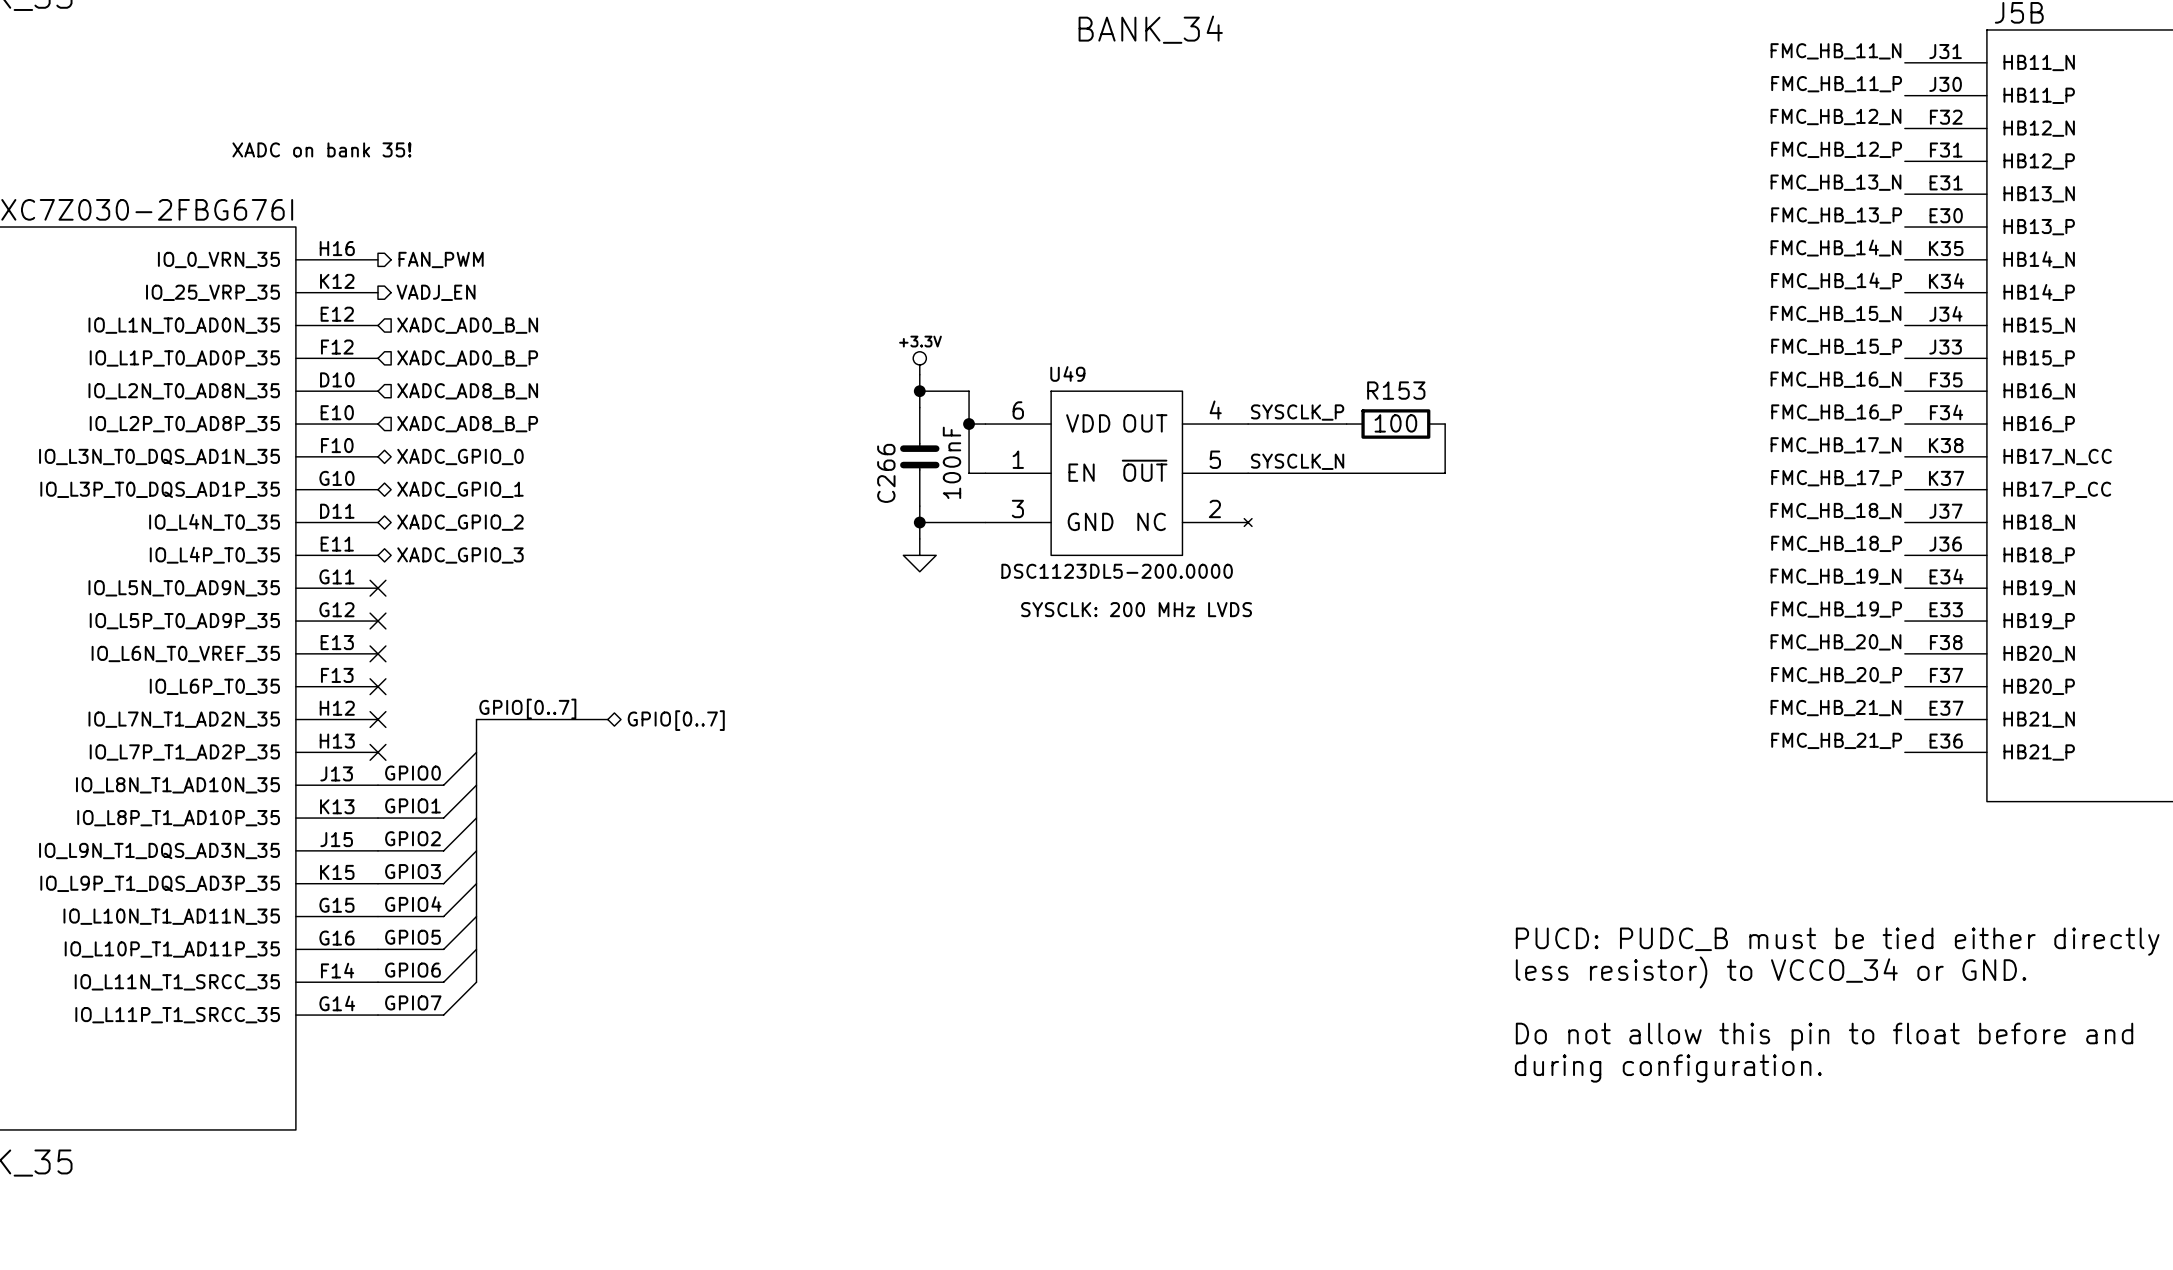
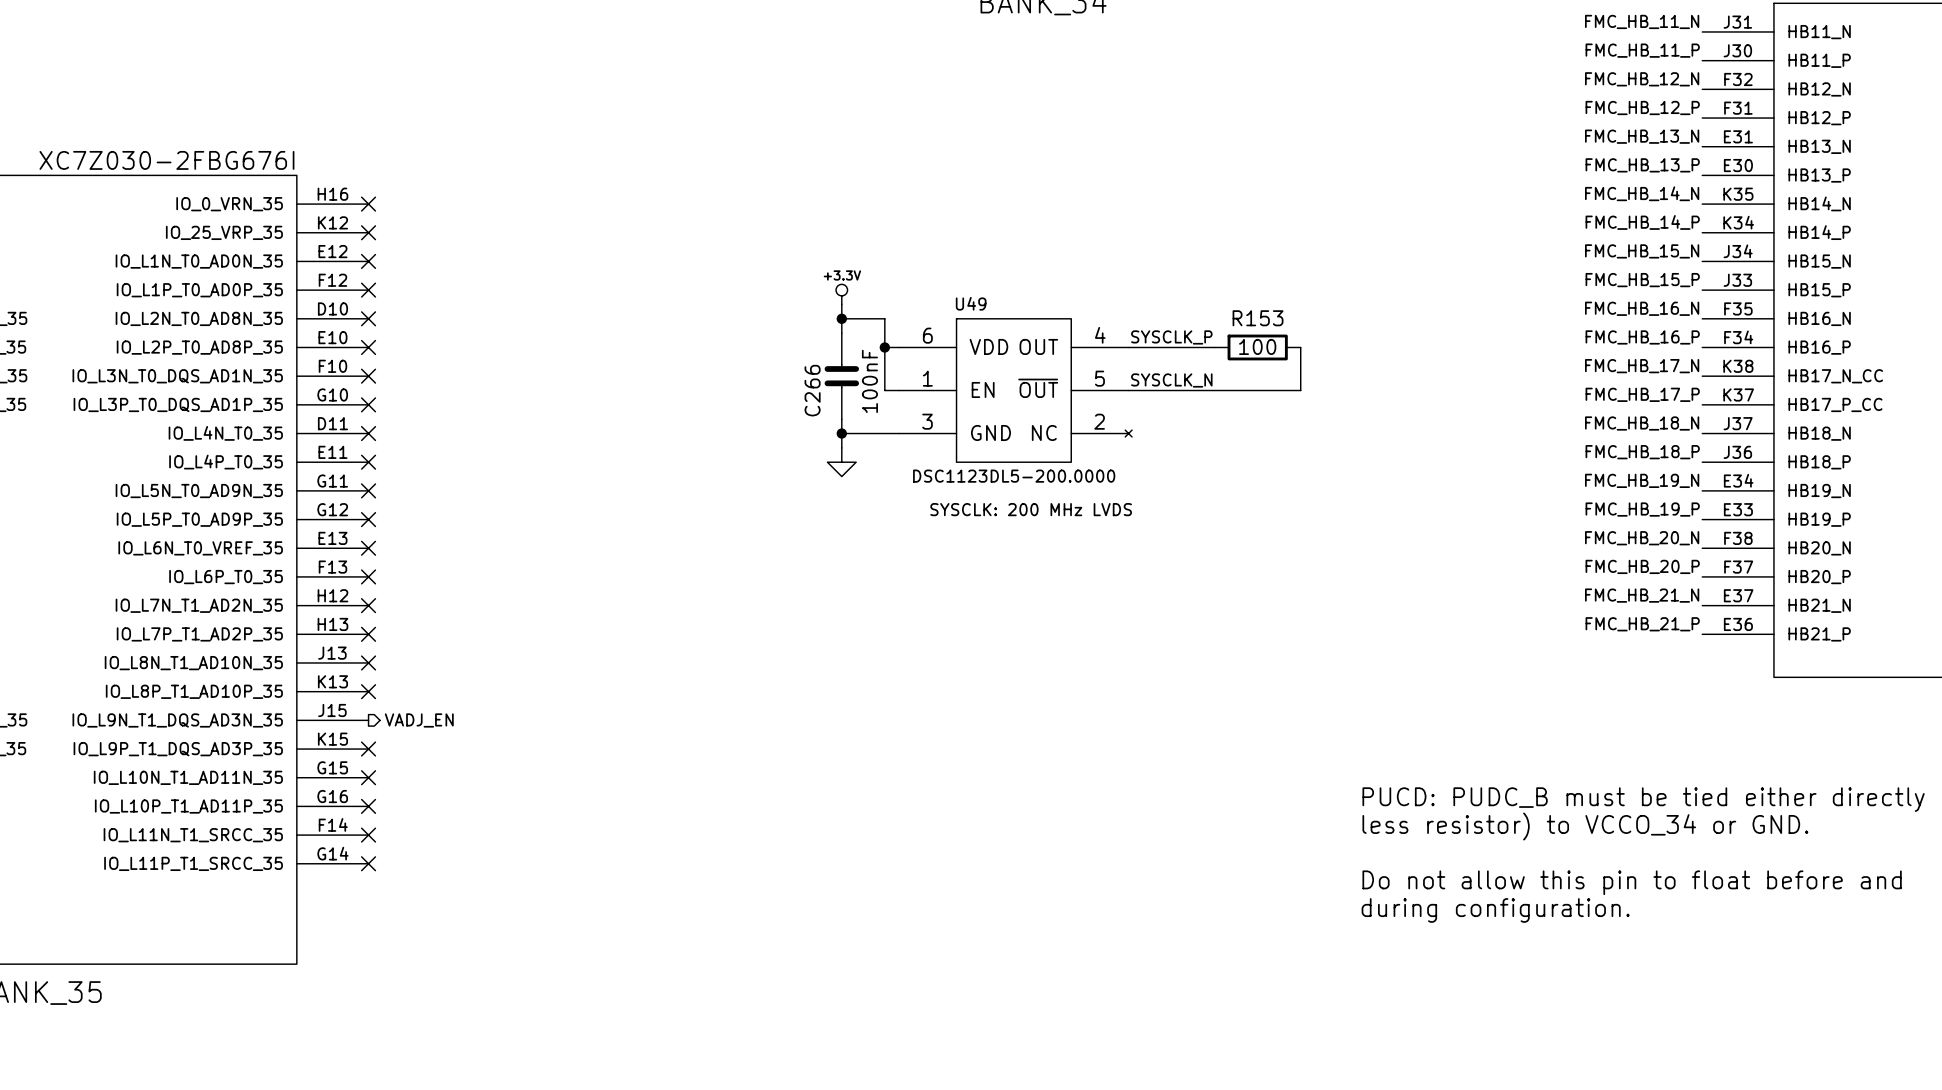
text: XADC on bank 35! (321, 149) -> none
no-connect mark: none -> (368, 204)
hierarchical label: FAN_PWM (441, 259) -> none
no-connect mark: none -> (368, 232)
hierarchical label: VADJ_EN (436, 292) -> none
no-connect mark: none -> (368, 261)
hierarchical label: XADC_AD0_B_N (467, 325) -> none
no-connect mark: none -> (368, 290)
hierarchical label: XADC_AD0_B_P (467, 358) -> none
no-connect mark: none -> (368, 318)
hierarchical label: XADC_AD8_B_N (467, 391) -> none
no-connect mark: none -> (368, 347)
hierarchical label: XADC_AD8_B_P (467, 424) -> none
no-connect mark: none -> (368, 376)
hierarchical label: XADC_GPIO_0 (460, 456) -> none
no-connect mark: none -> (368, 404)
hierarchical label: XADC_GPIO_1 (460, 489) -> none
no-connect mark: none -> (368, 433)
hierarchical label: XADC_GPIO_2 (460, 522) -> none
no-connect mark: none -> (368, 462)
hierarchical label: XADC_GPIO_3 (460, 555) -> none
label: GPIO[0..7] (527, 708) -> none
bus: (607, 719) (476, 719) (476, 982) -> none
hierarchical label: GPIO[0..7] (676, 720) -> none
wire: (476, 752) (443, 785) (378, 785) -> none
label: GPIO0 (412, 773) -> none
no-connect mark: none -> (368, 662)
wire: (476, 785) (443, 818) (378, 818) -> none
label: GPIO1 (412, 805) -> none
no-connect mark: none -> (368, 691)
wire: (476, 818) (443, 850) (378, 850) -> none
label: GPIO2 (412, 838) -> none
wire: (476, 850) (443, 883) (378, 883) -> none
hierarchical label: none -> VADJ_EN (419, 720)
label: GPIO3 (412, 871) -> none
no-connect mark: none -> (368, 749)
wire: (476, 883) (443, 916) (378, 916) -> none
label: GPIO4 (413, 904) -> none
no-connect mark: none -> (368, 777)
wire: (476, 916) (443, 949) (378, 949) -> none
label: GPIO5 (412, 937) -> none
no-connect mark: none -> (368, 806)
wire: (476, 949) (443, 982) (378, 982) -> none
label: GPIO6 (412, 970) -> none
no-connect mark: none -> (368, 835)
wire: (476, 982) (443, 1015) (378, 1015) -> none
label: GPIO7 (413, 1002) -> none
no-connect mark: none -> (368, 863)

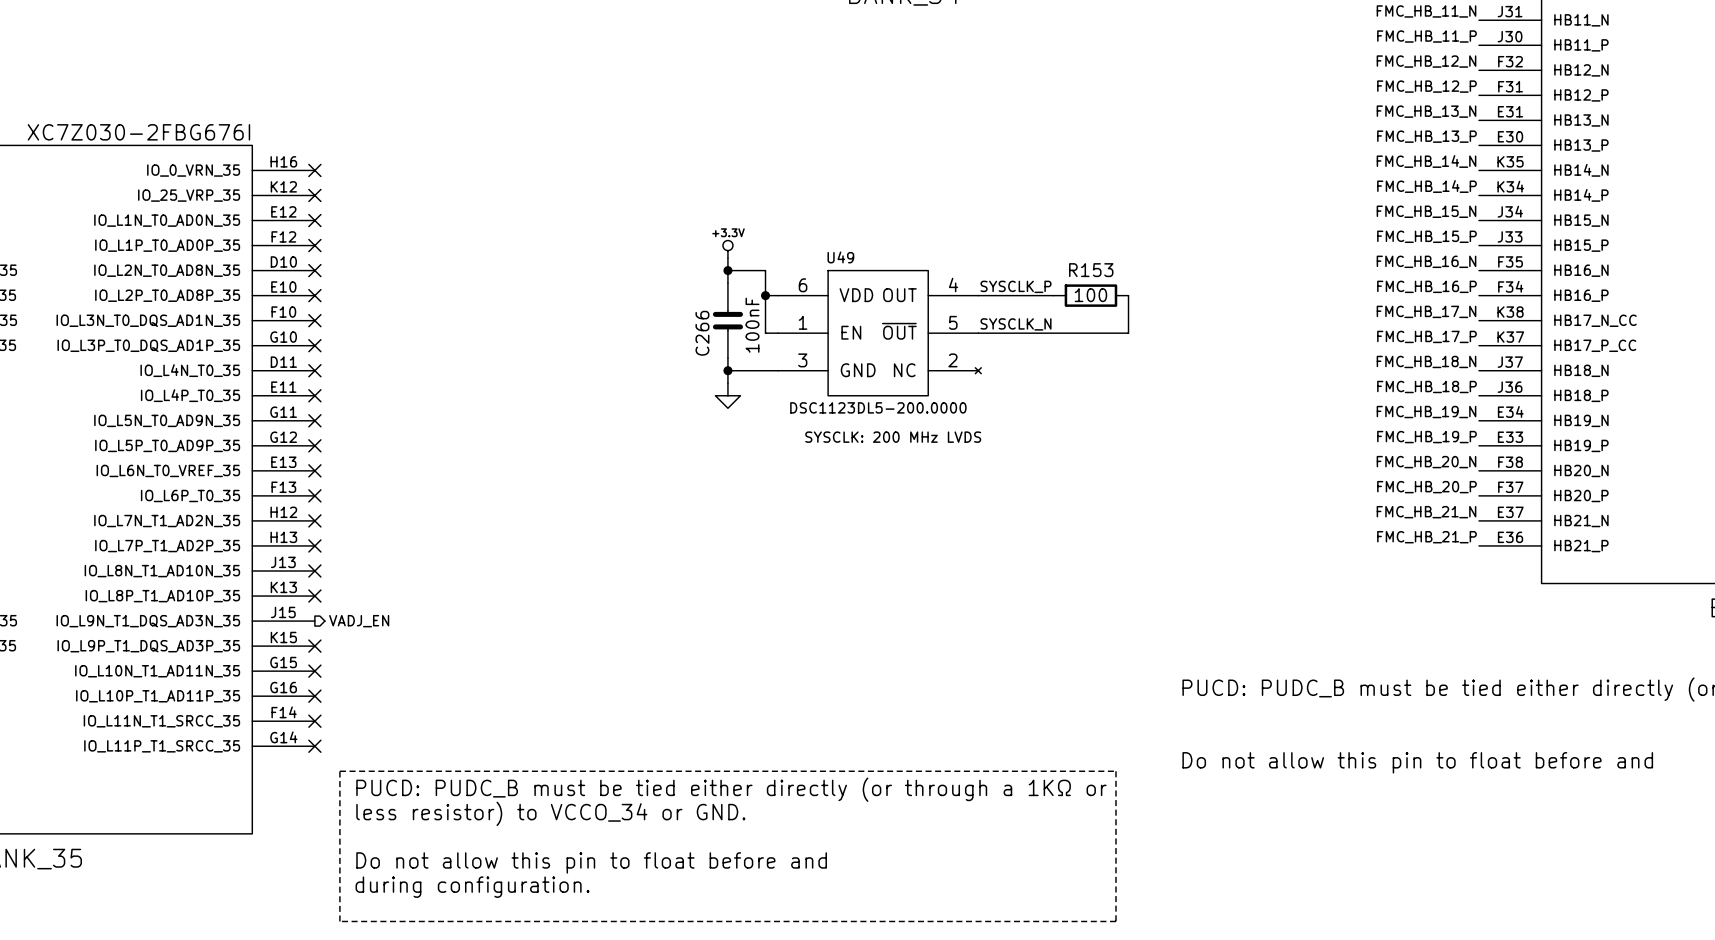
text: less resistor) to VCCO_34 or GND. (1585, 826) -> none
line: none -> (339, 771) (1115, 771) (1115, 921) (339, 921) (339, 771)
text: during configuration. (1495, 910) -> none
text: none -> PUCD: PUDC_B must be tied either directly (or through a 1KΩ or (731, 789)
text: none -> less resistor) to VCCO_34 or GND. (550, 813)
text: none -> Do not allow this pin to float before and (591, 862)
text: none -> during configuration. (472, 887)

